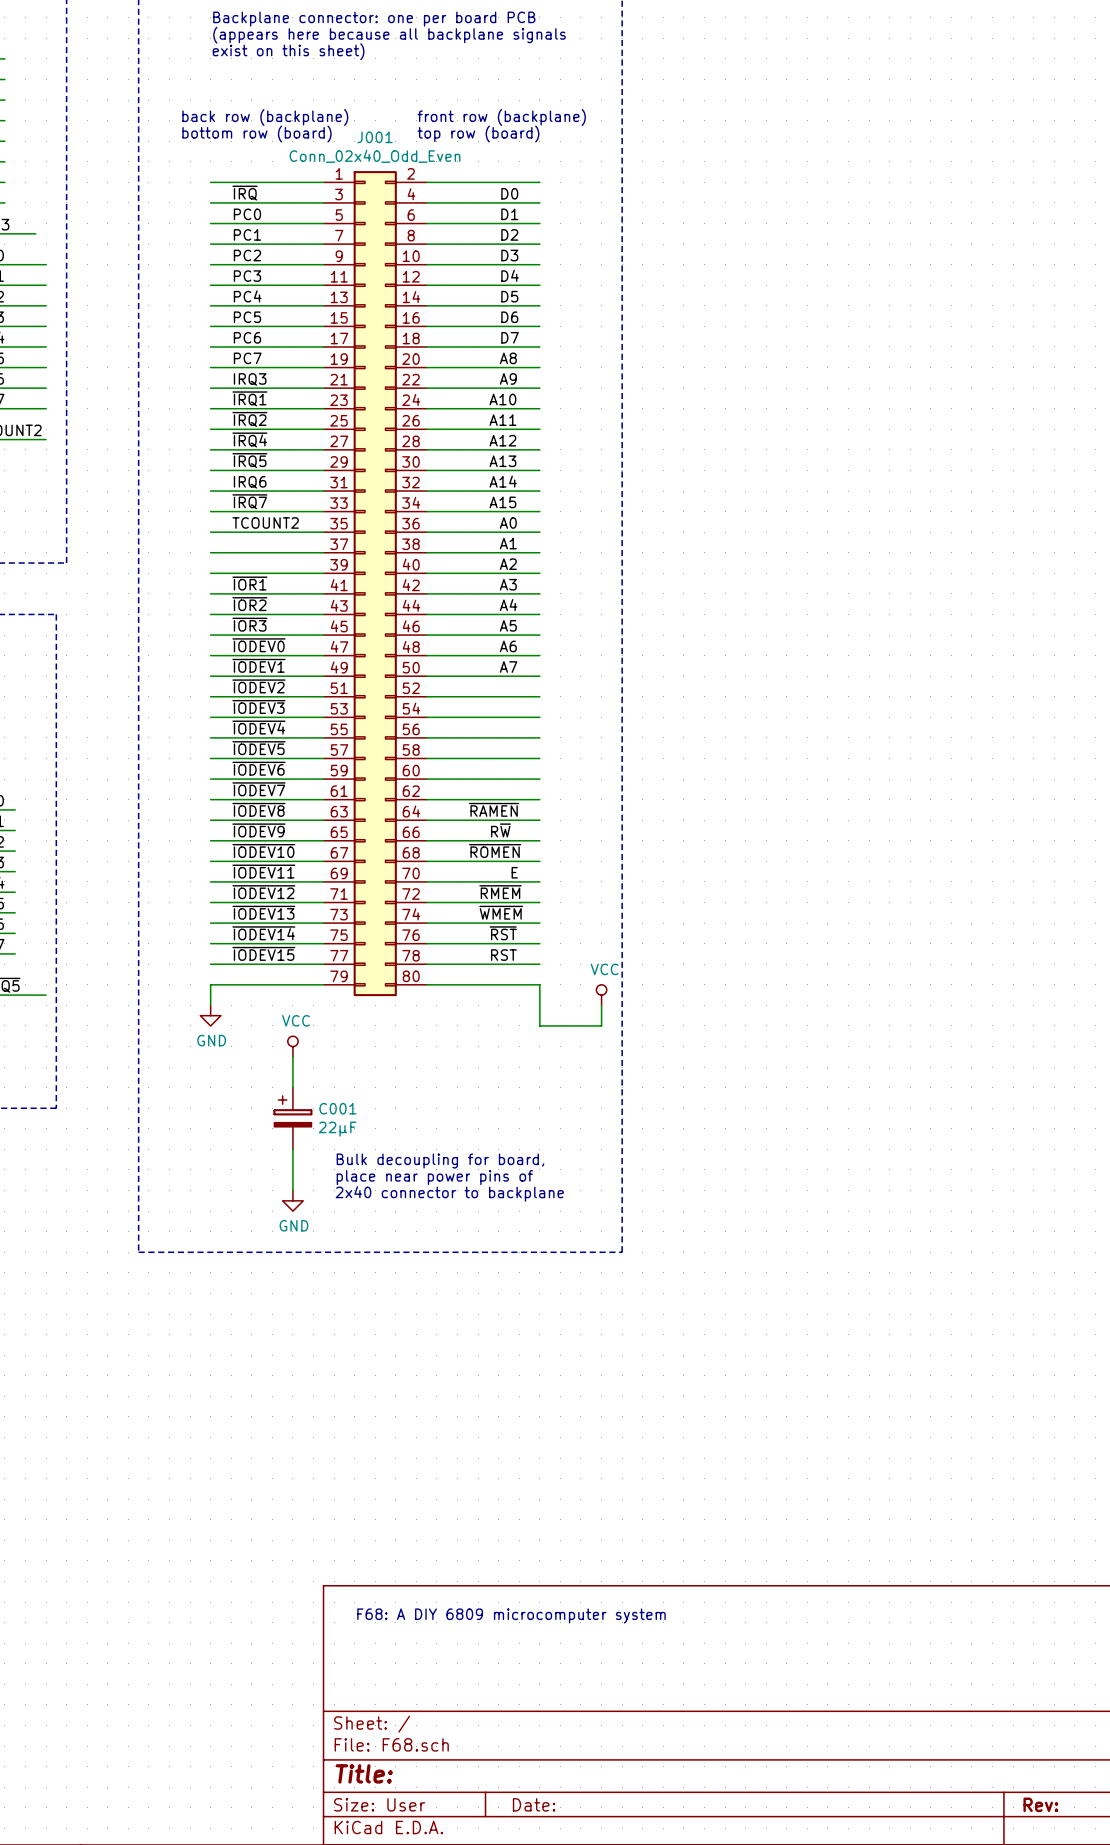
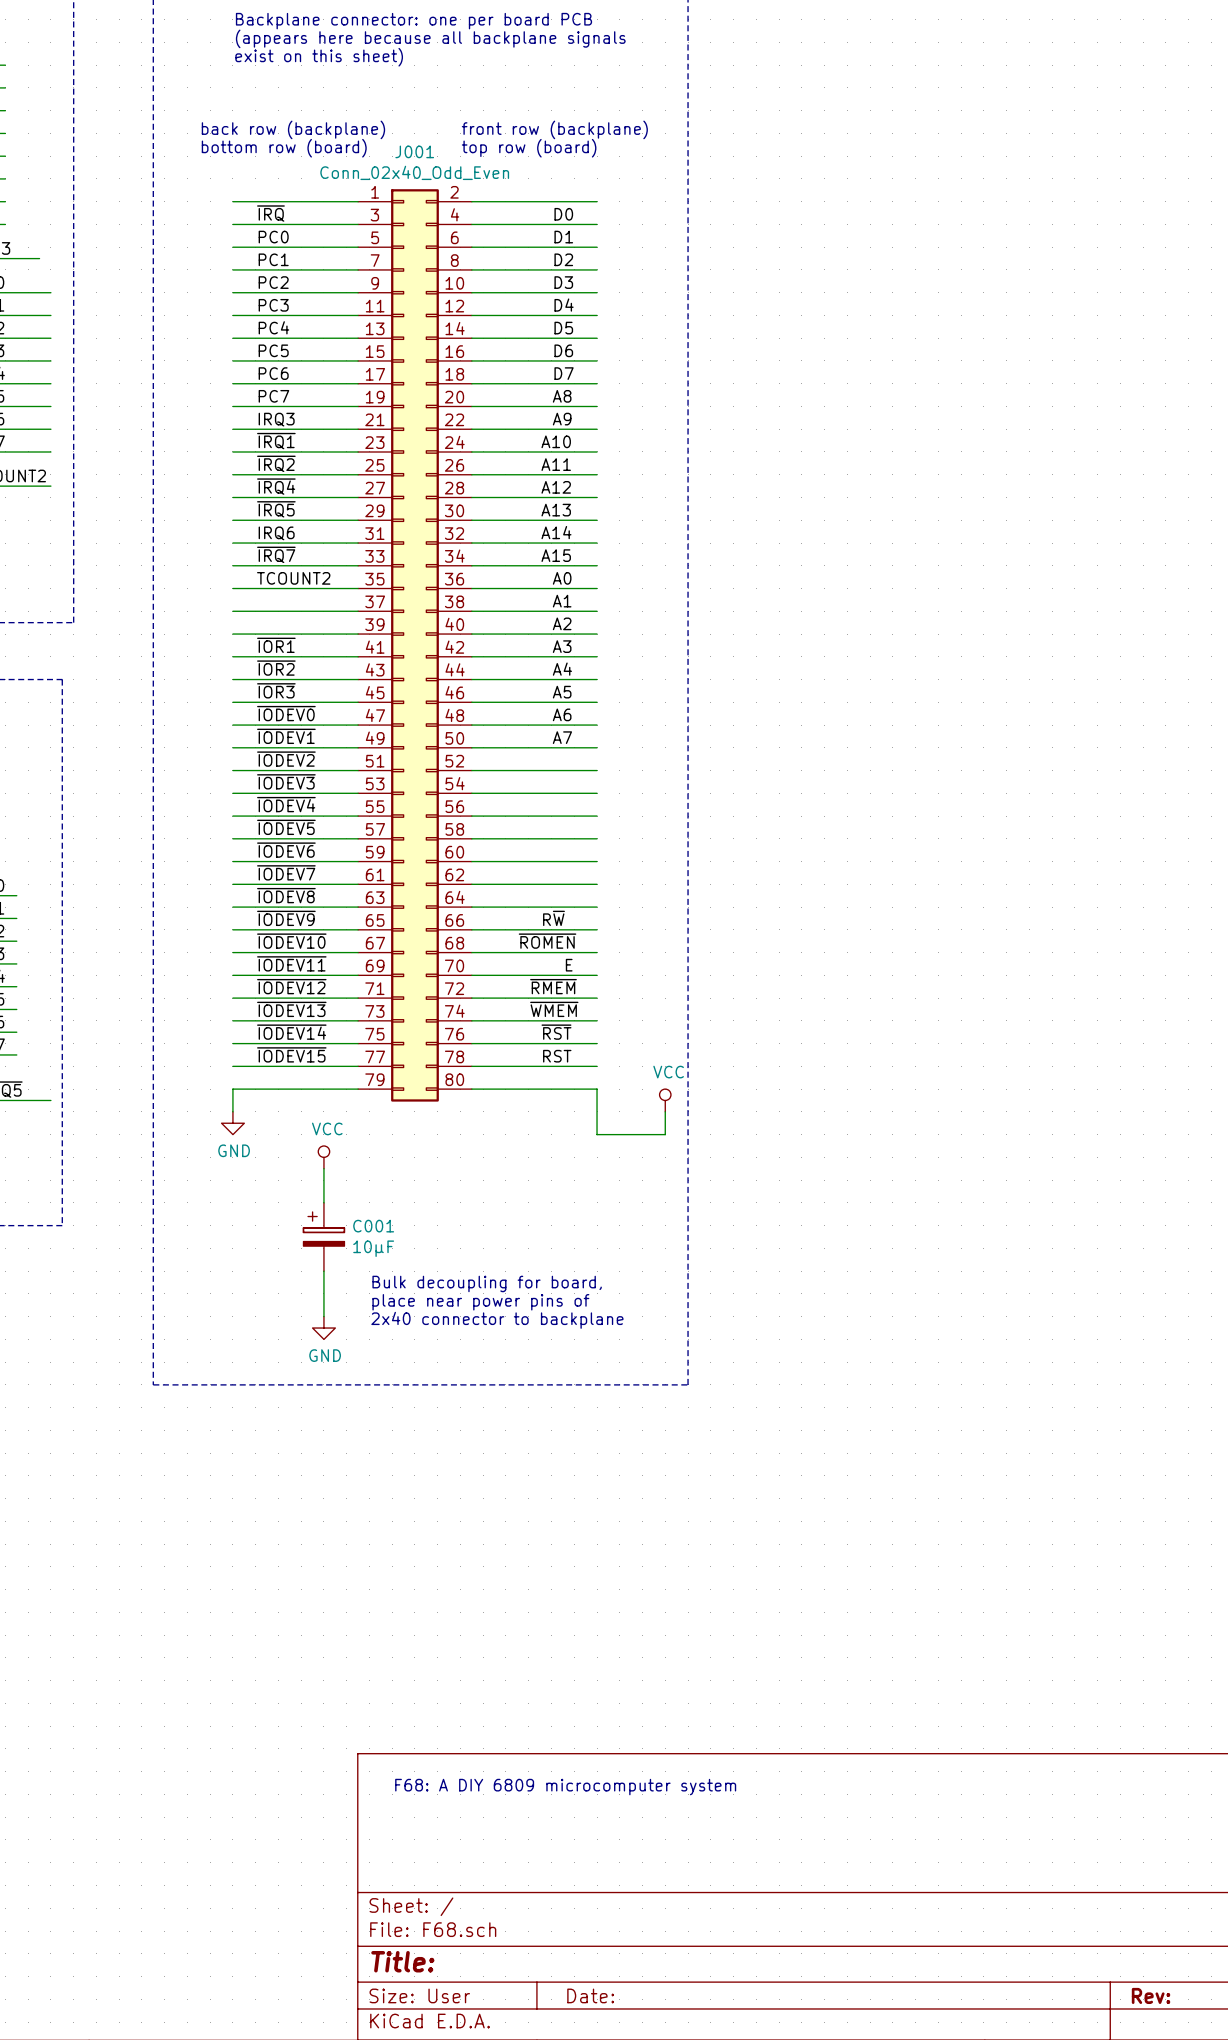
label: ~{RAMEN} (494, 809) -> none
C001 value: 22μF (337, 1129) -> 10μF (373, 1248)

